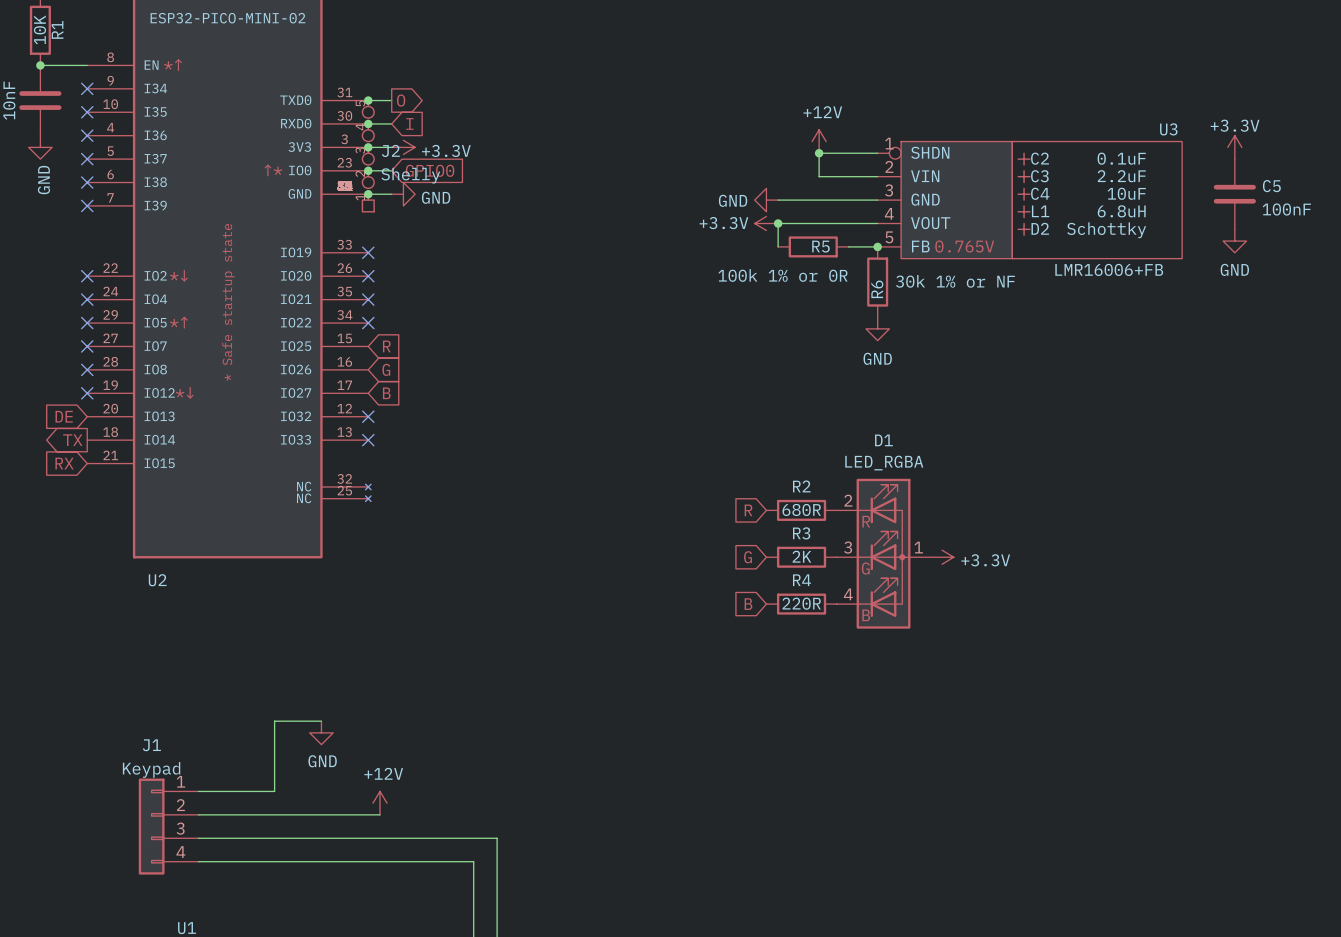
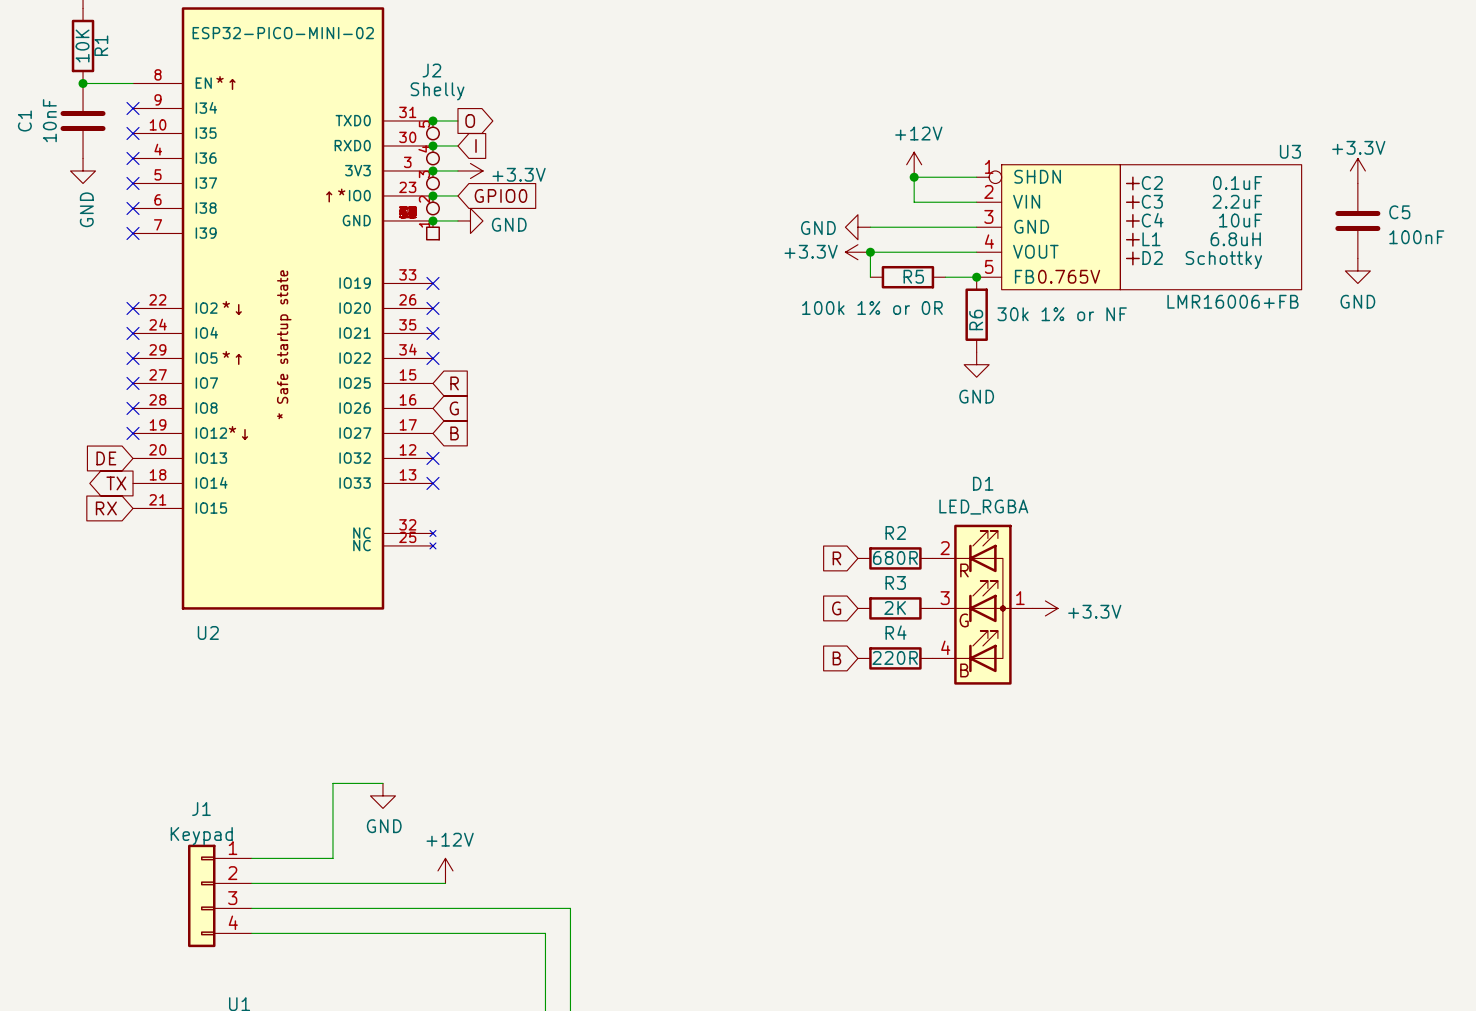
J2 name position: J2 (390, 150) -> J2 (431, 70)
J2 value position: Shelly (410, 175) -> Shelly (437, 91)

